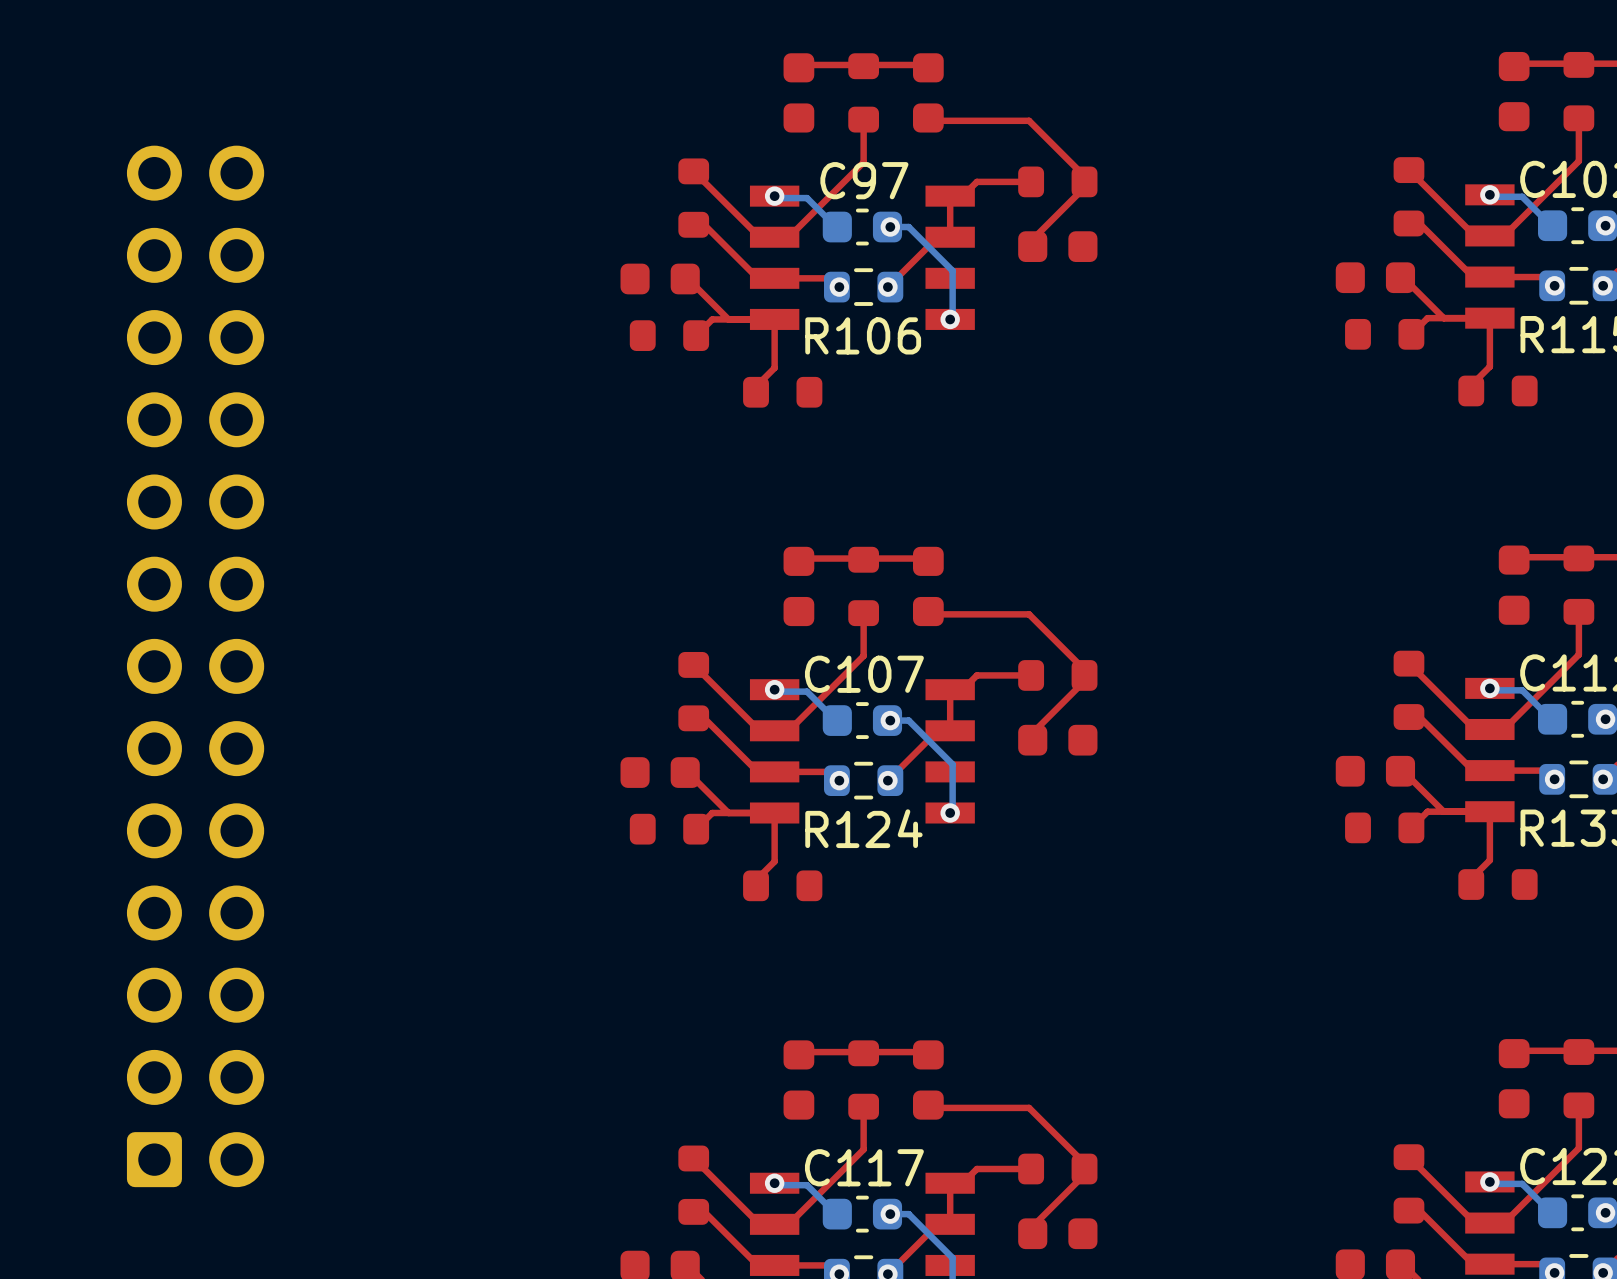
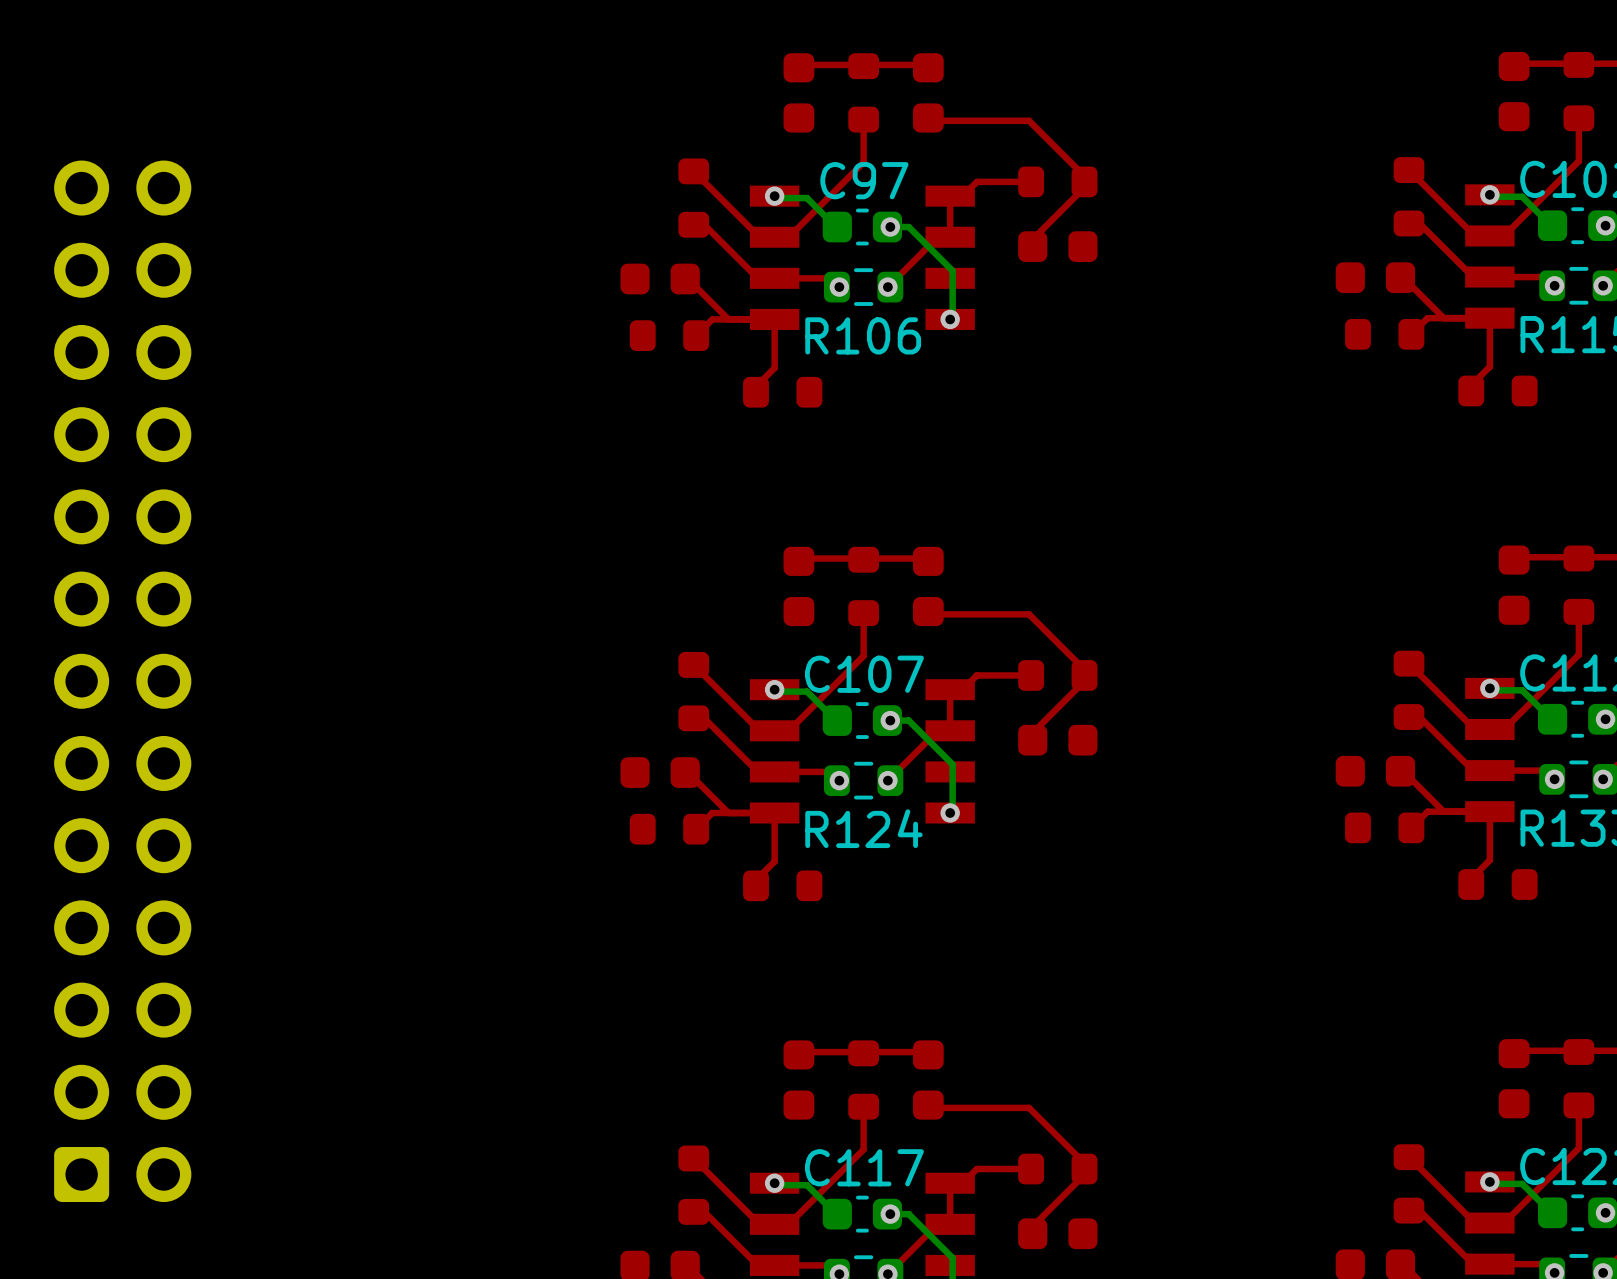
part position: (195, 666) -> (122, 681)

